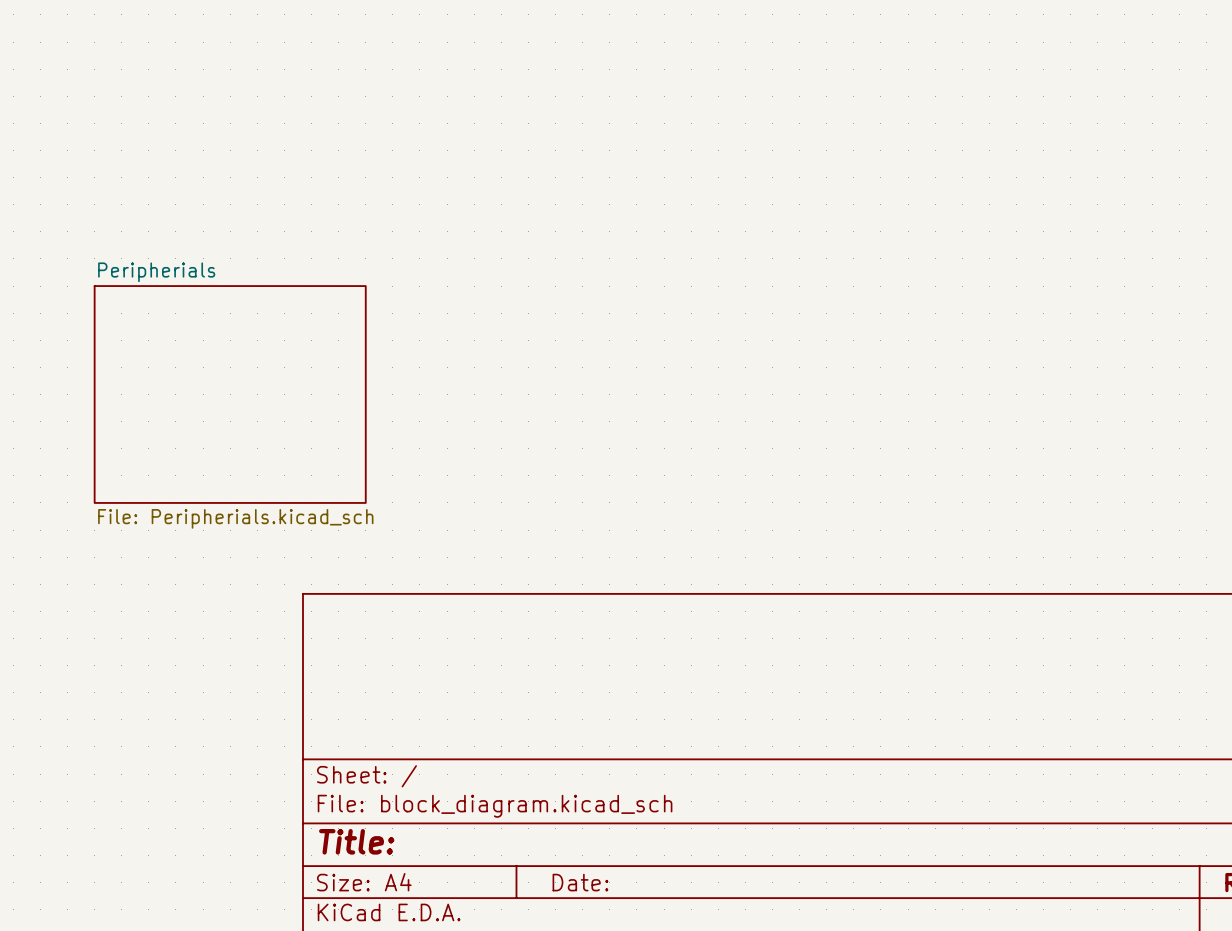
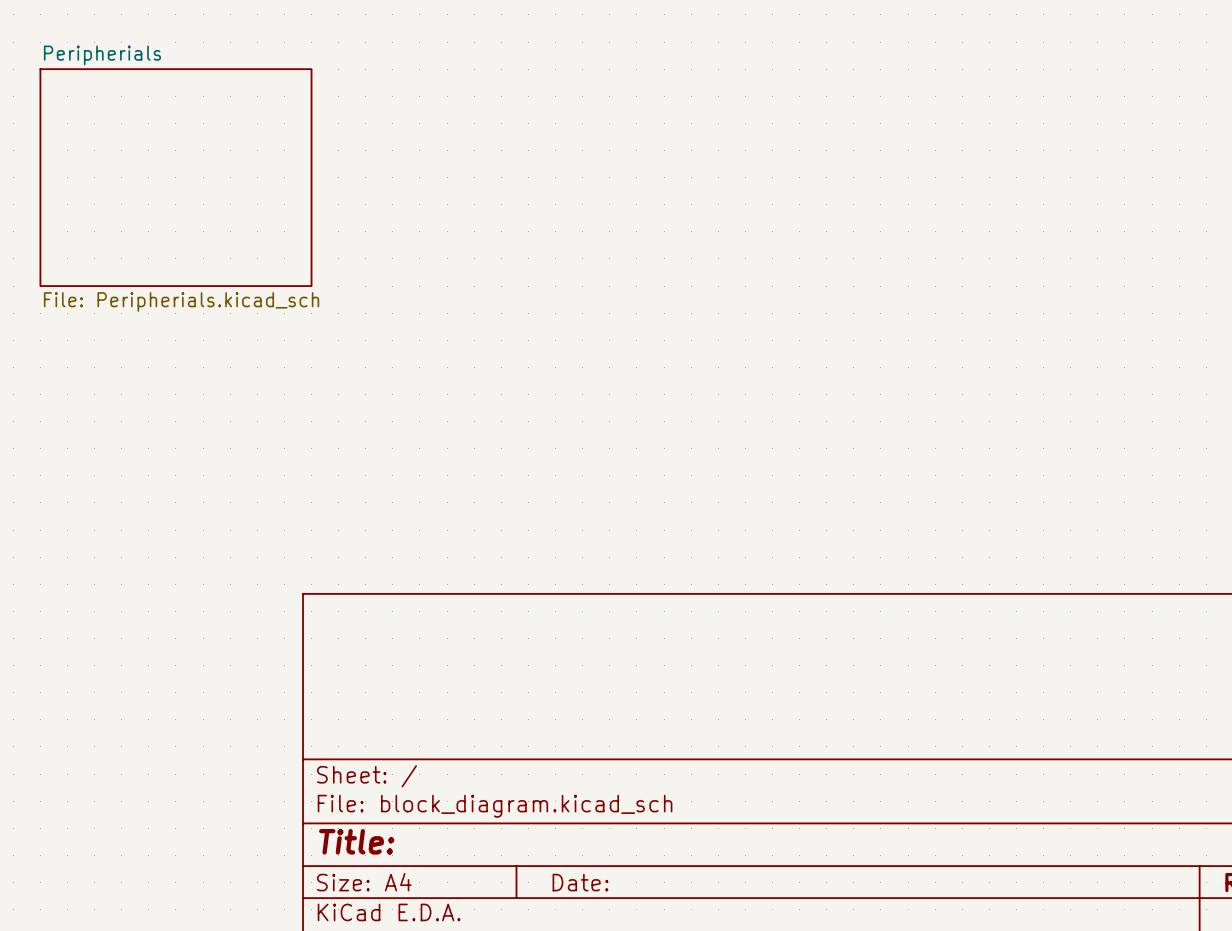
sheet Peripherials position: (230, 394) -> (175, 177)

